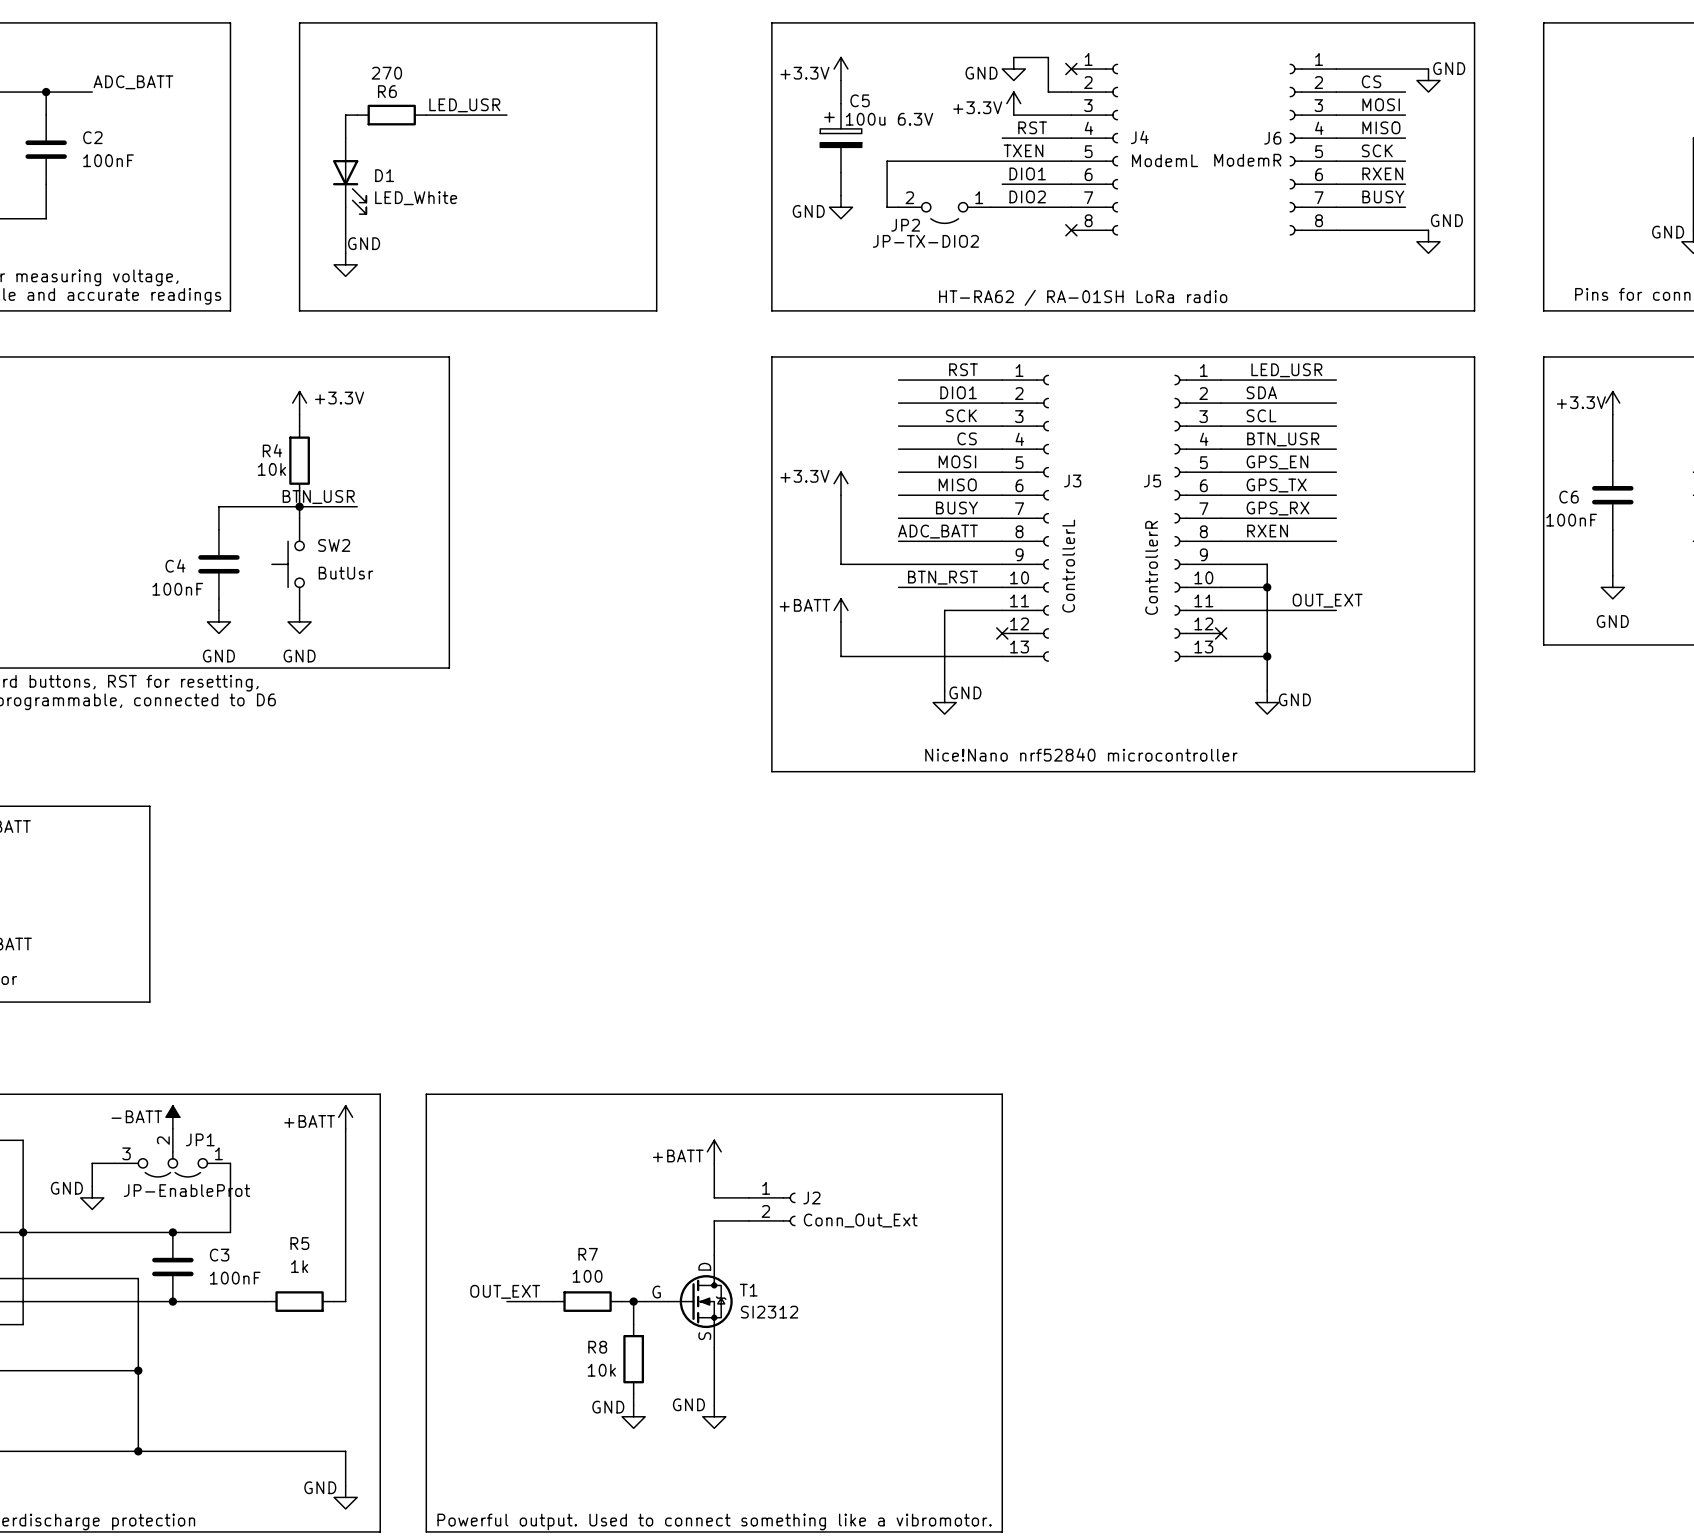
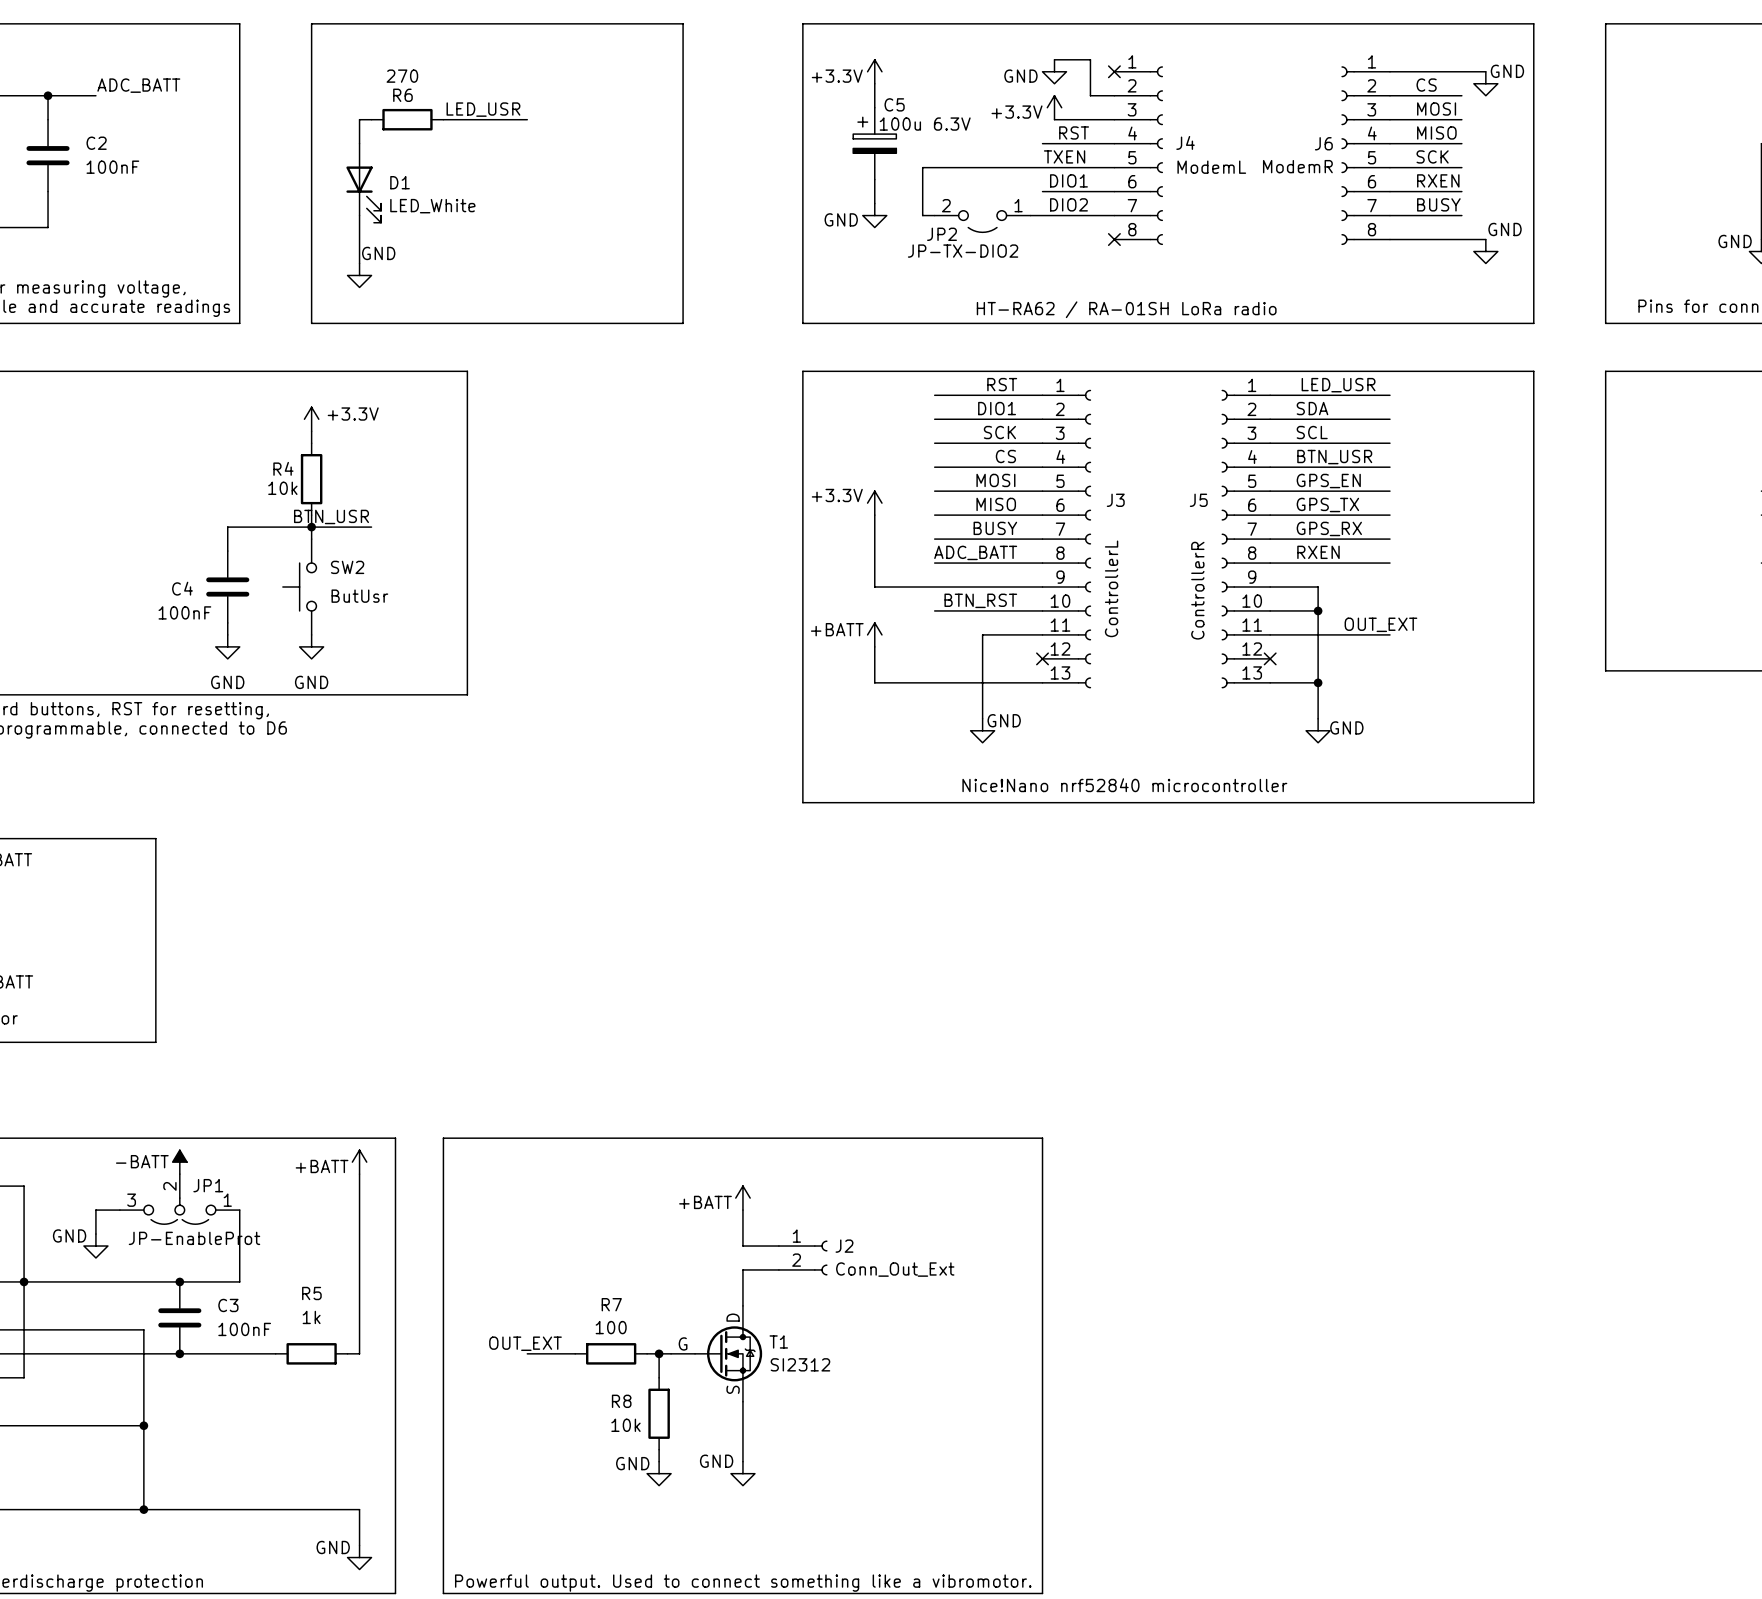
power symbol: +3.3V (1612, 403) -> none
wire: (1612, 414) (1612, 460) -> none
C6: 100nF (1612, 495) -> none
wire: (1612, 529) (1612, 575) -> none
power symbol: GND (1612, 587) -> none

